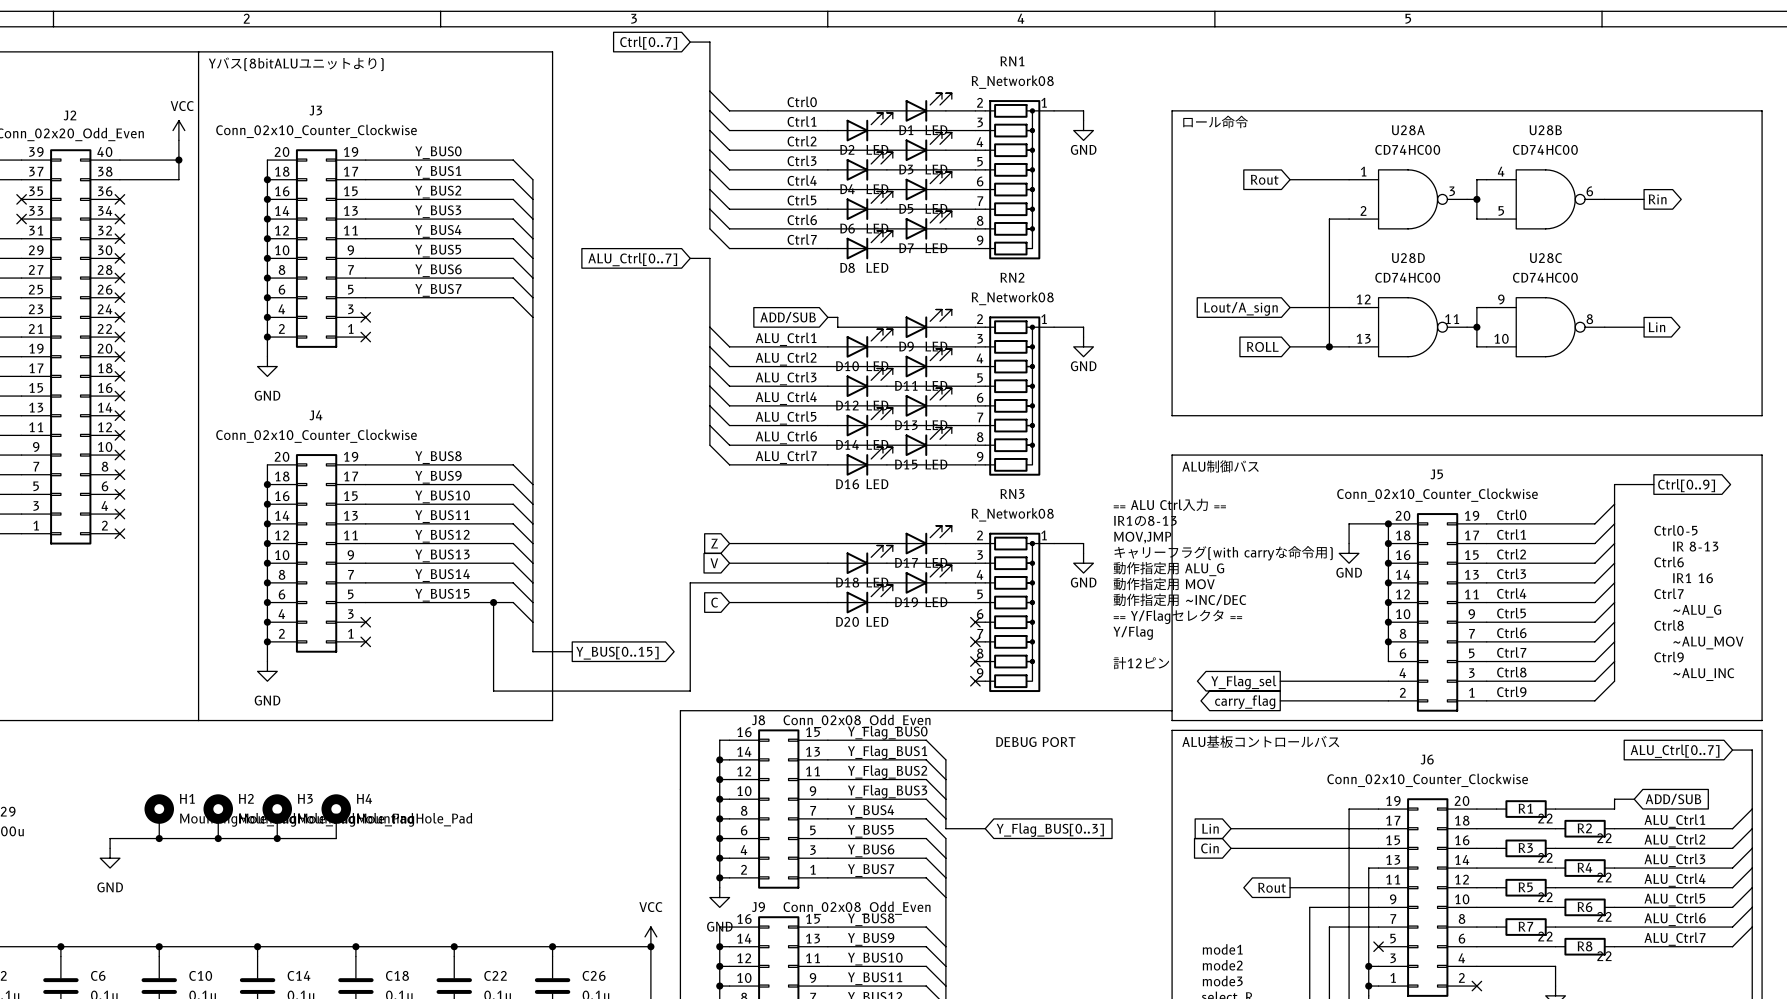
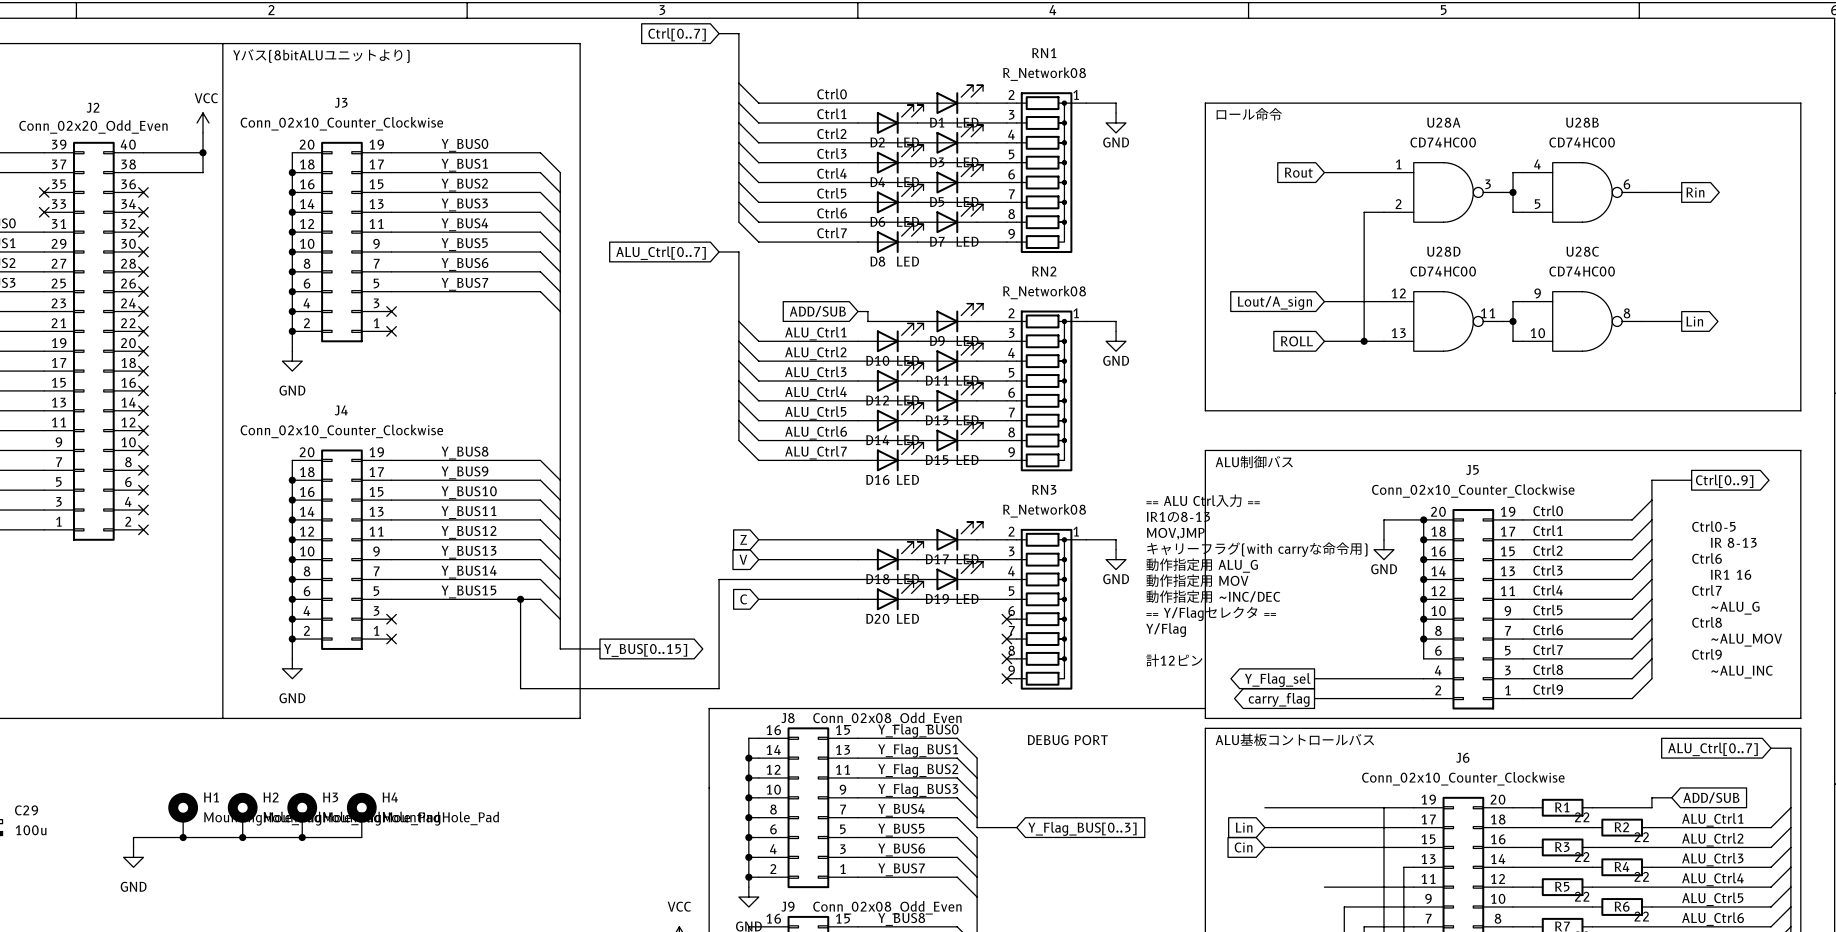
wire: none -> (1264, 807) (1383, 807)
global label: Rout (1272, 887) -> none

